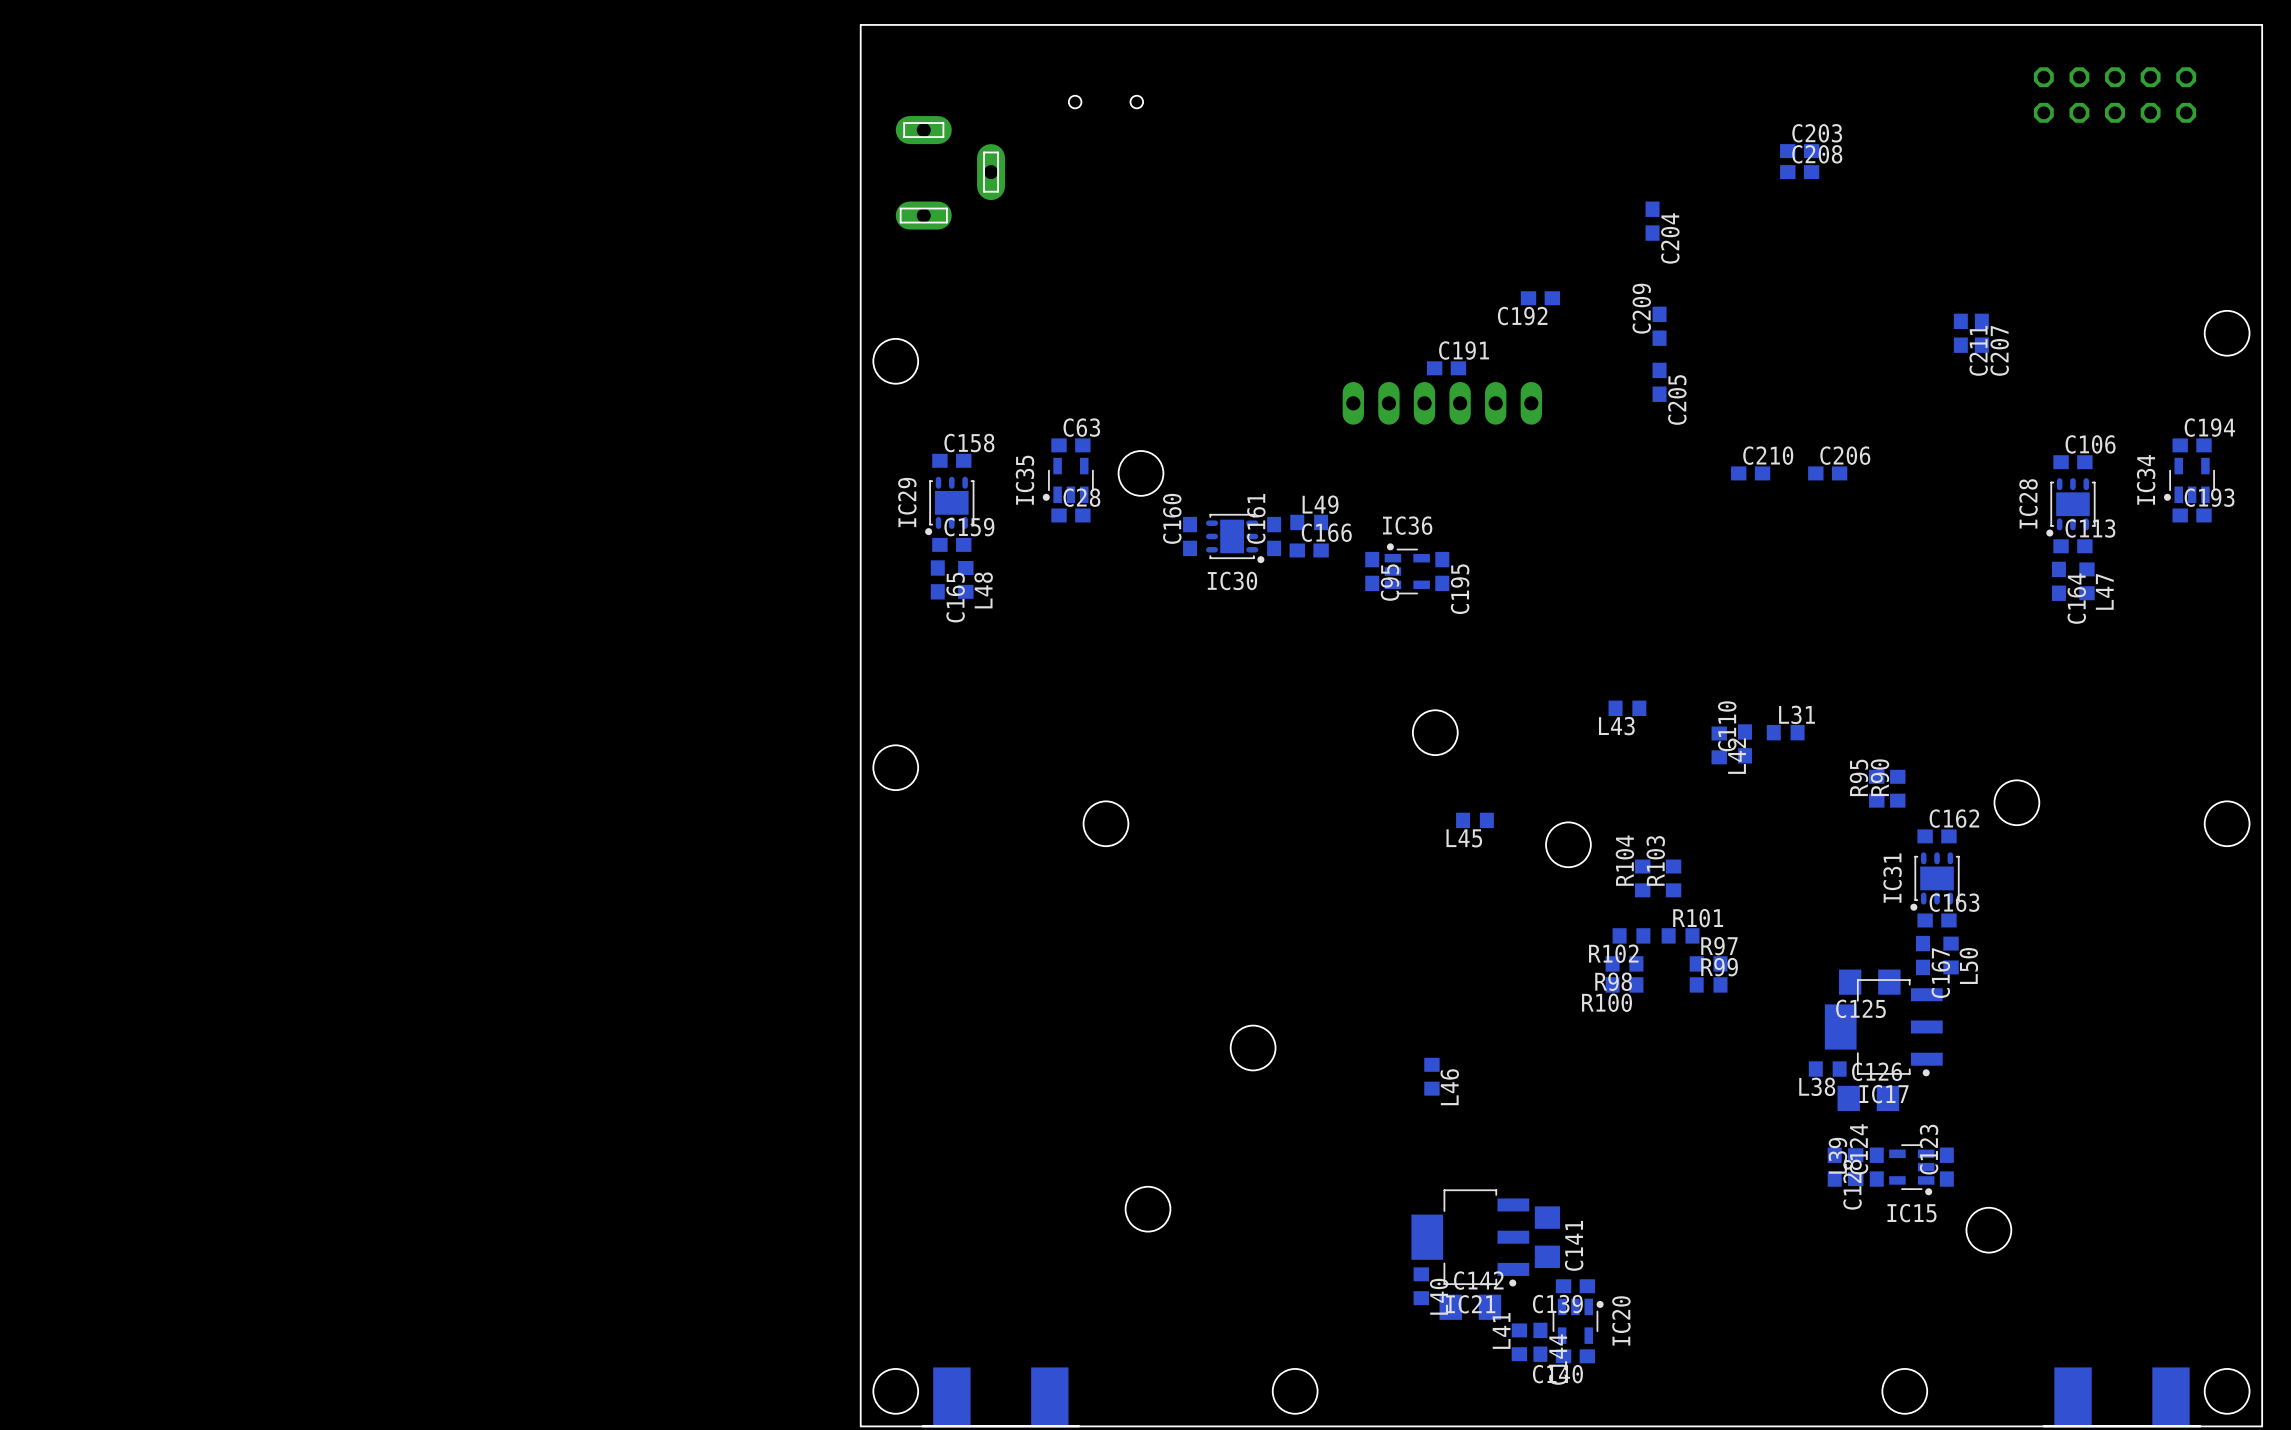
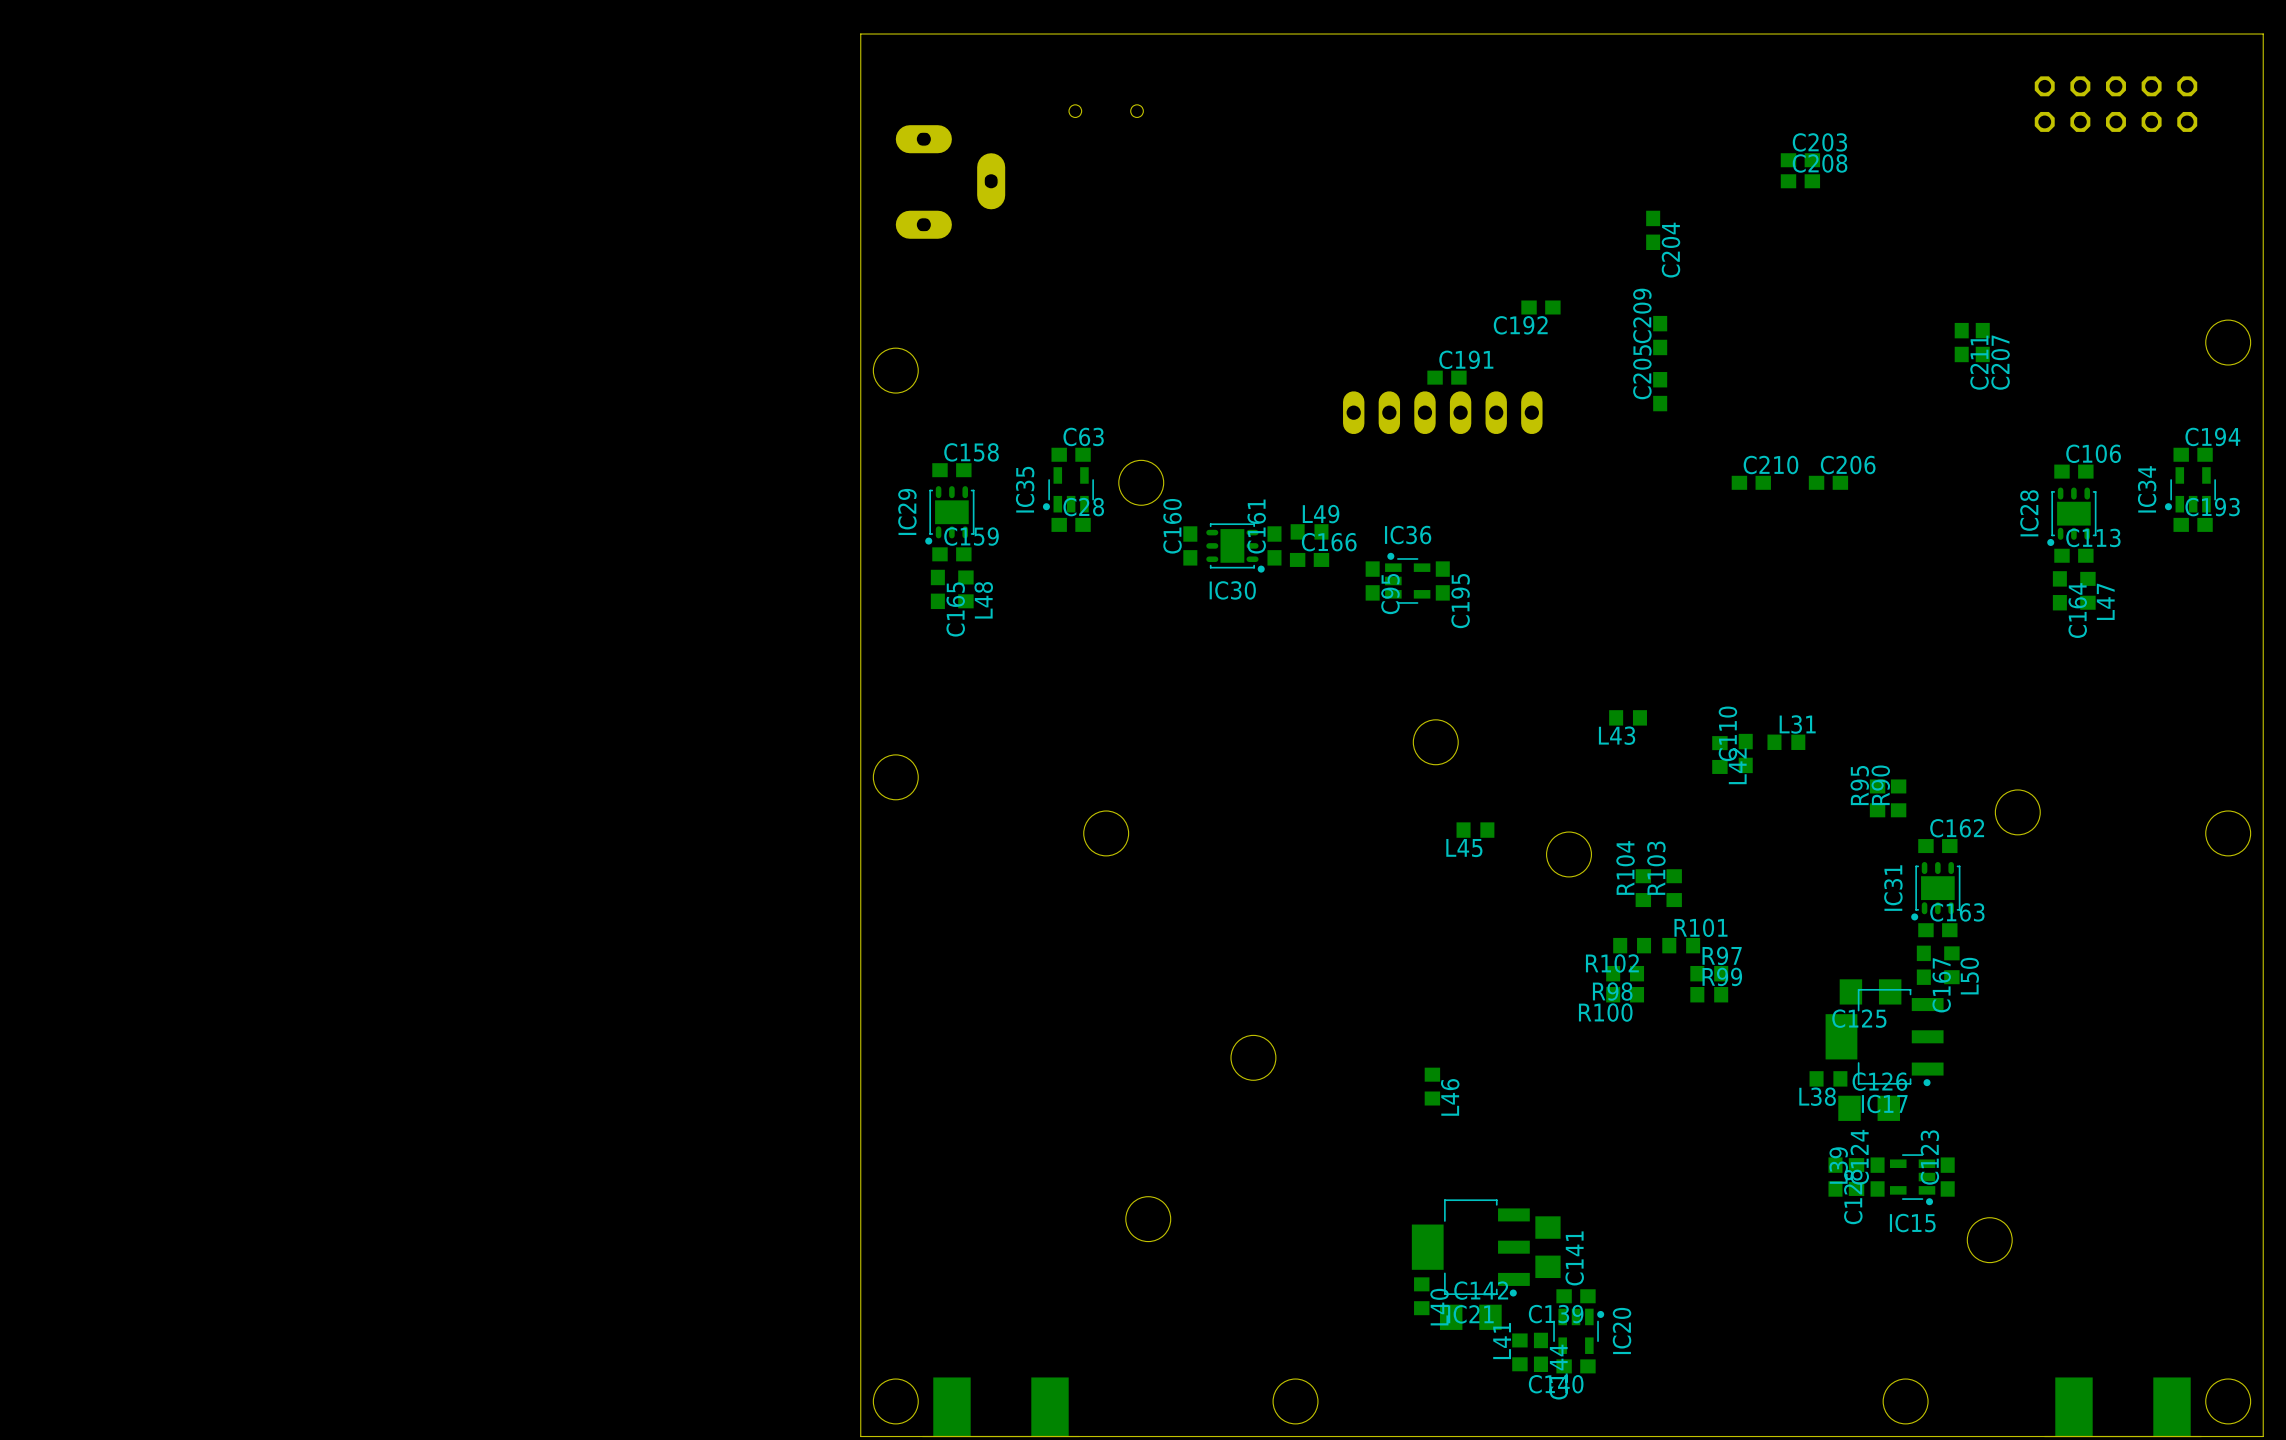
C205 name position: C205 (1677, 400) -> C205 (1642, 372)

